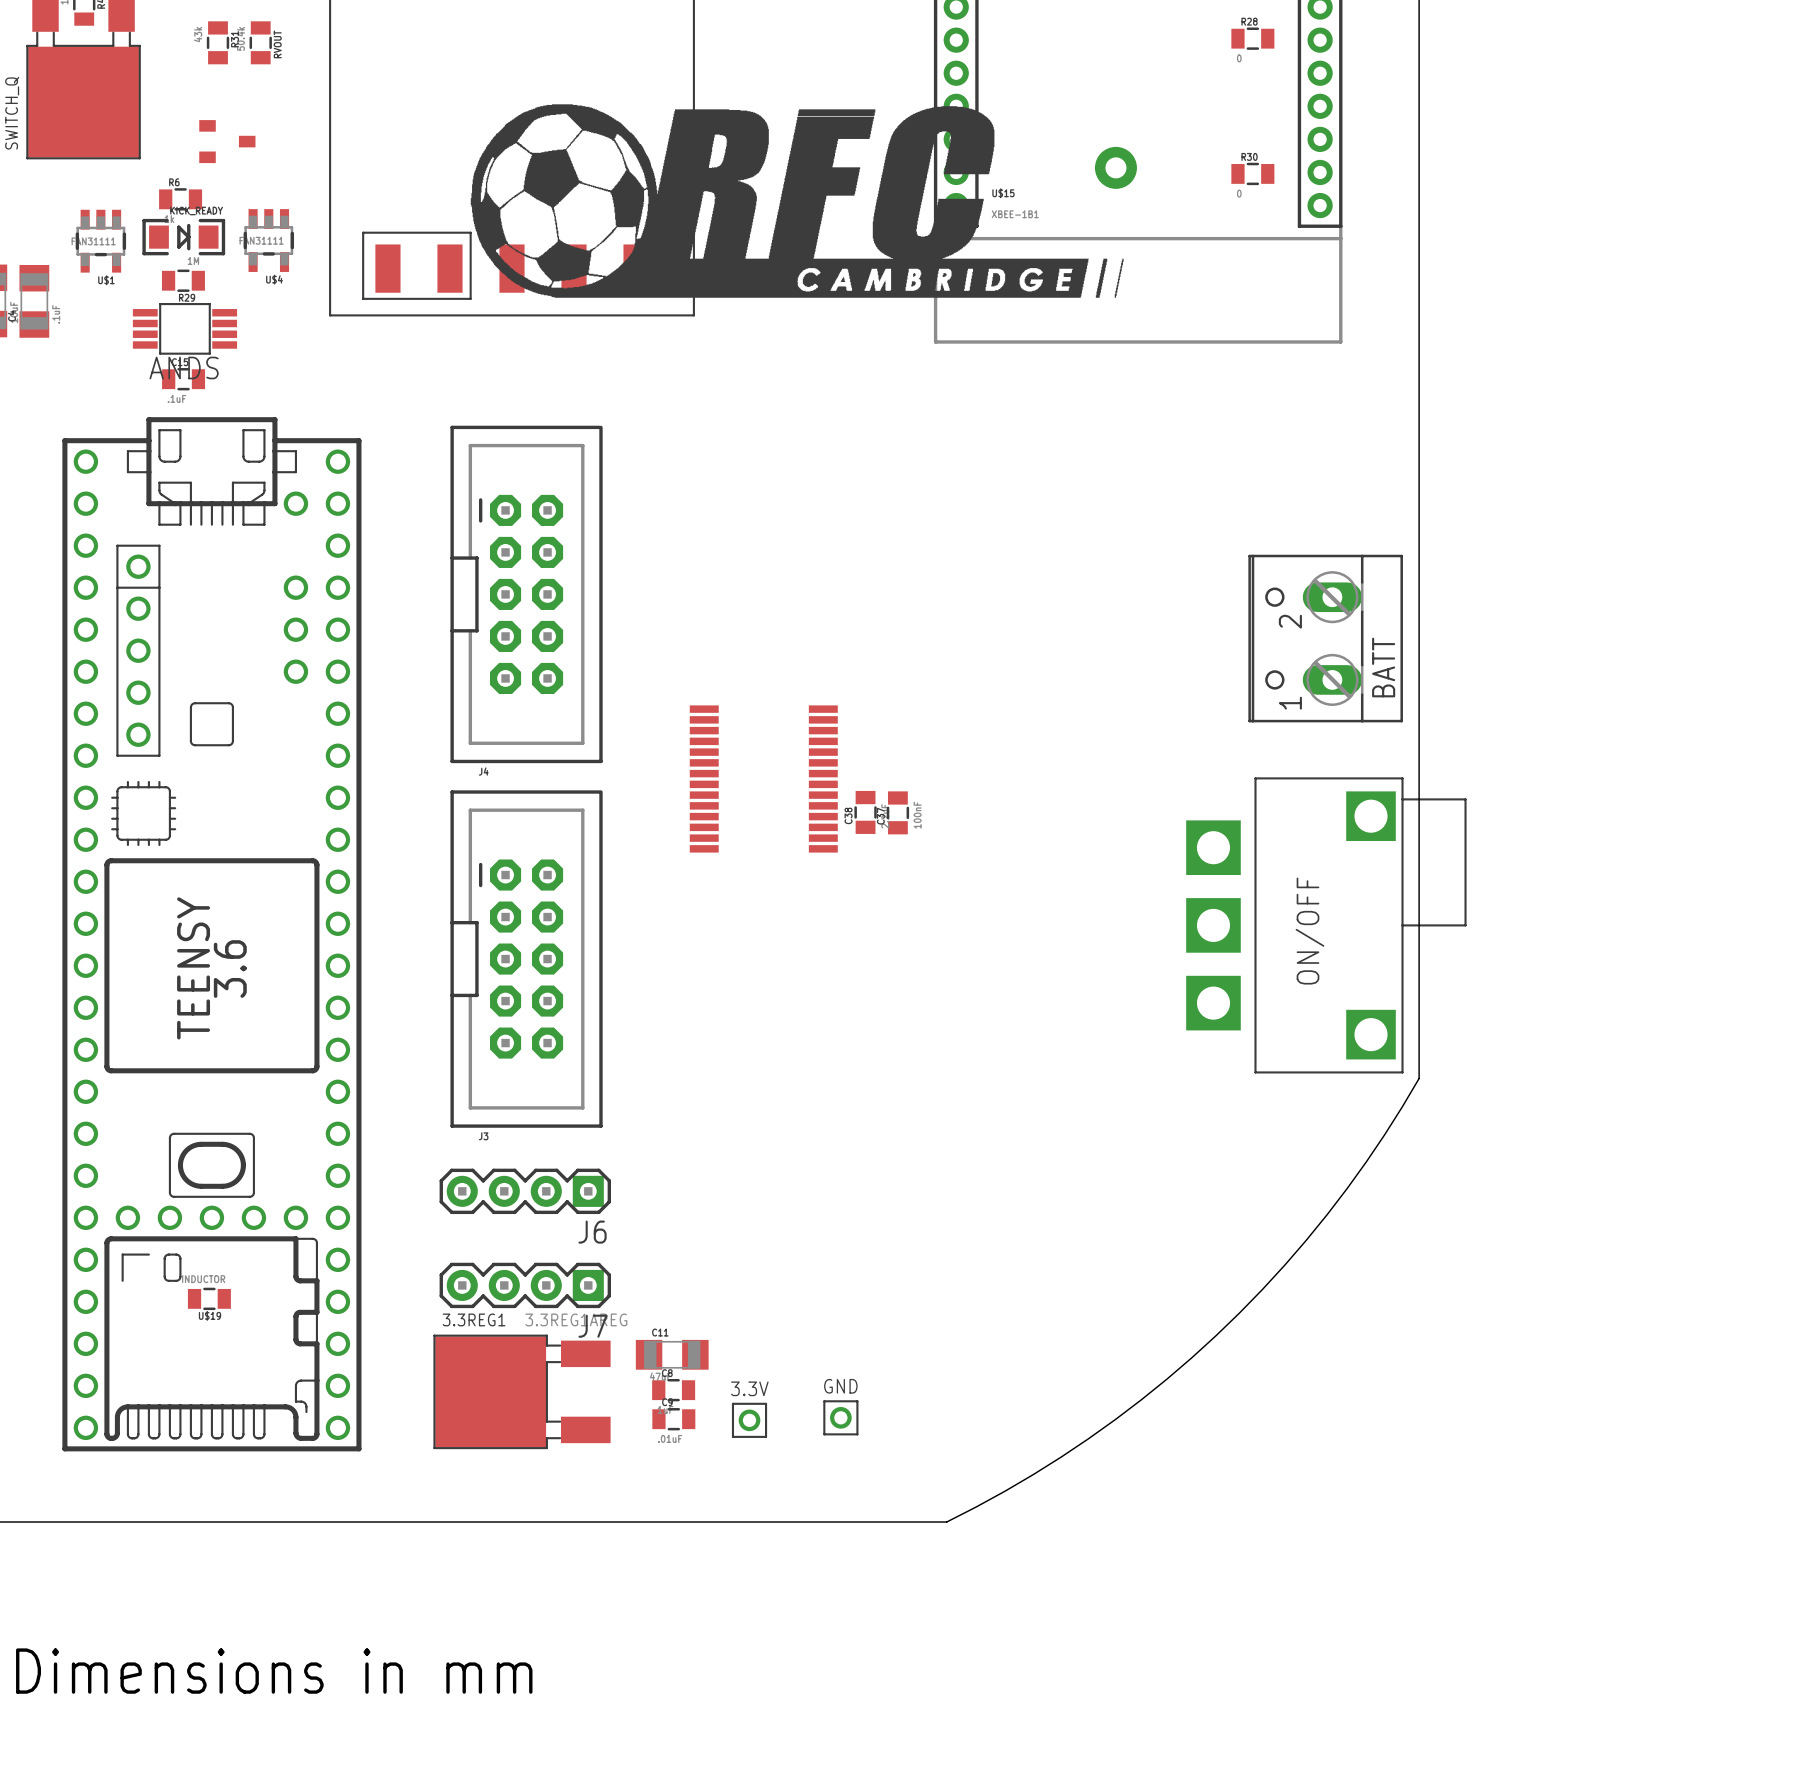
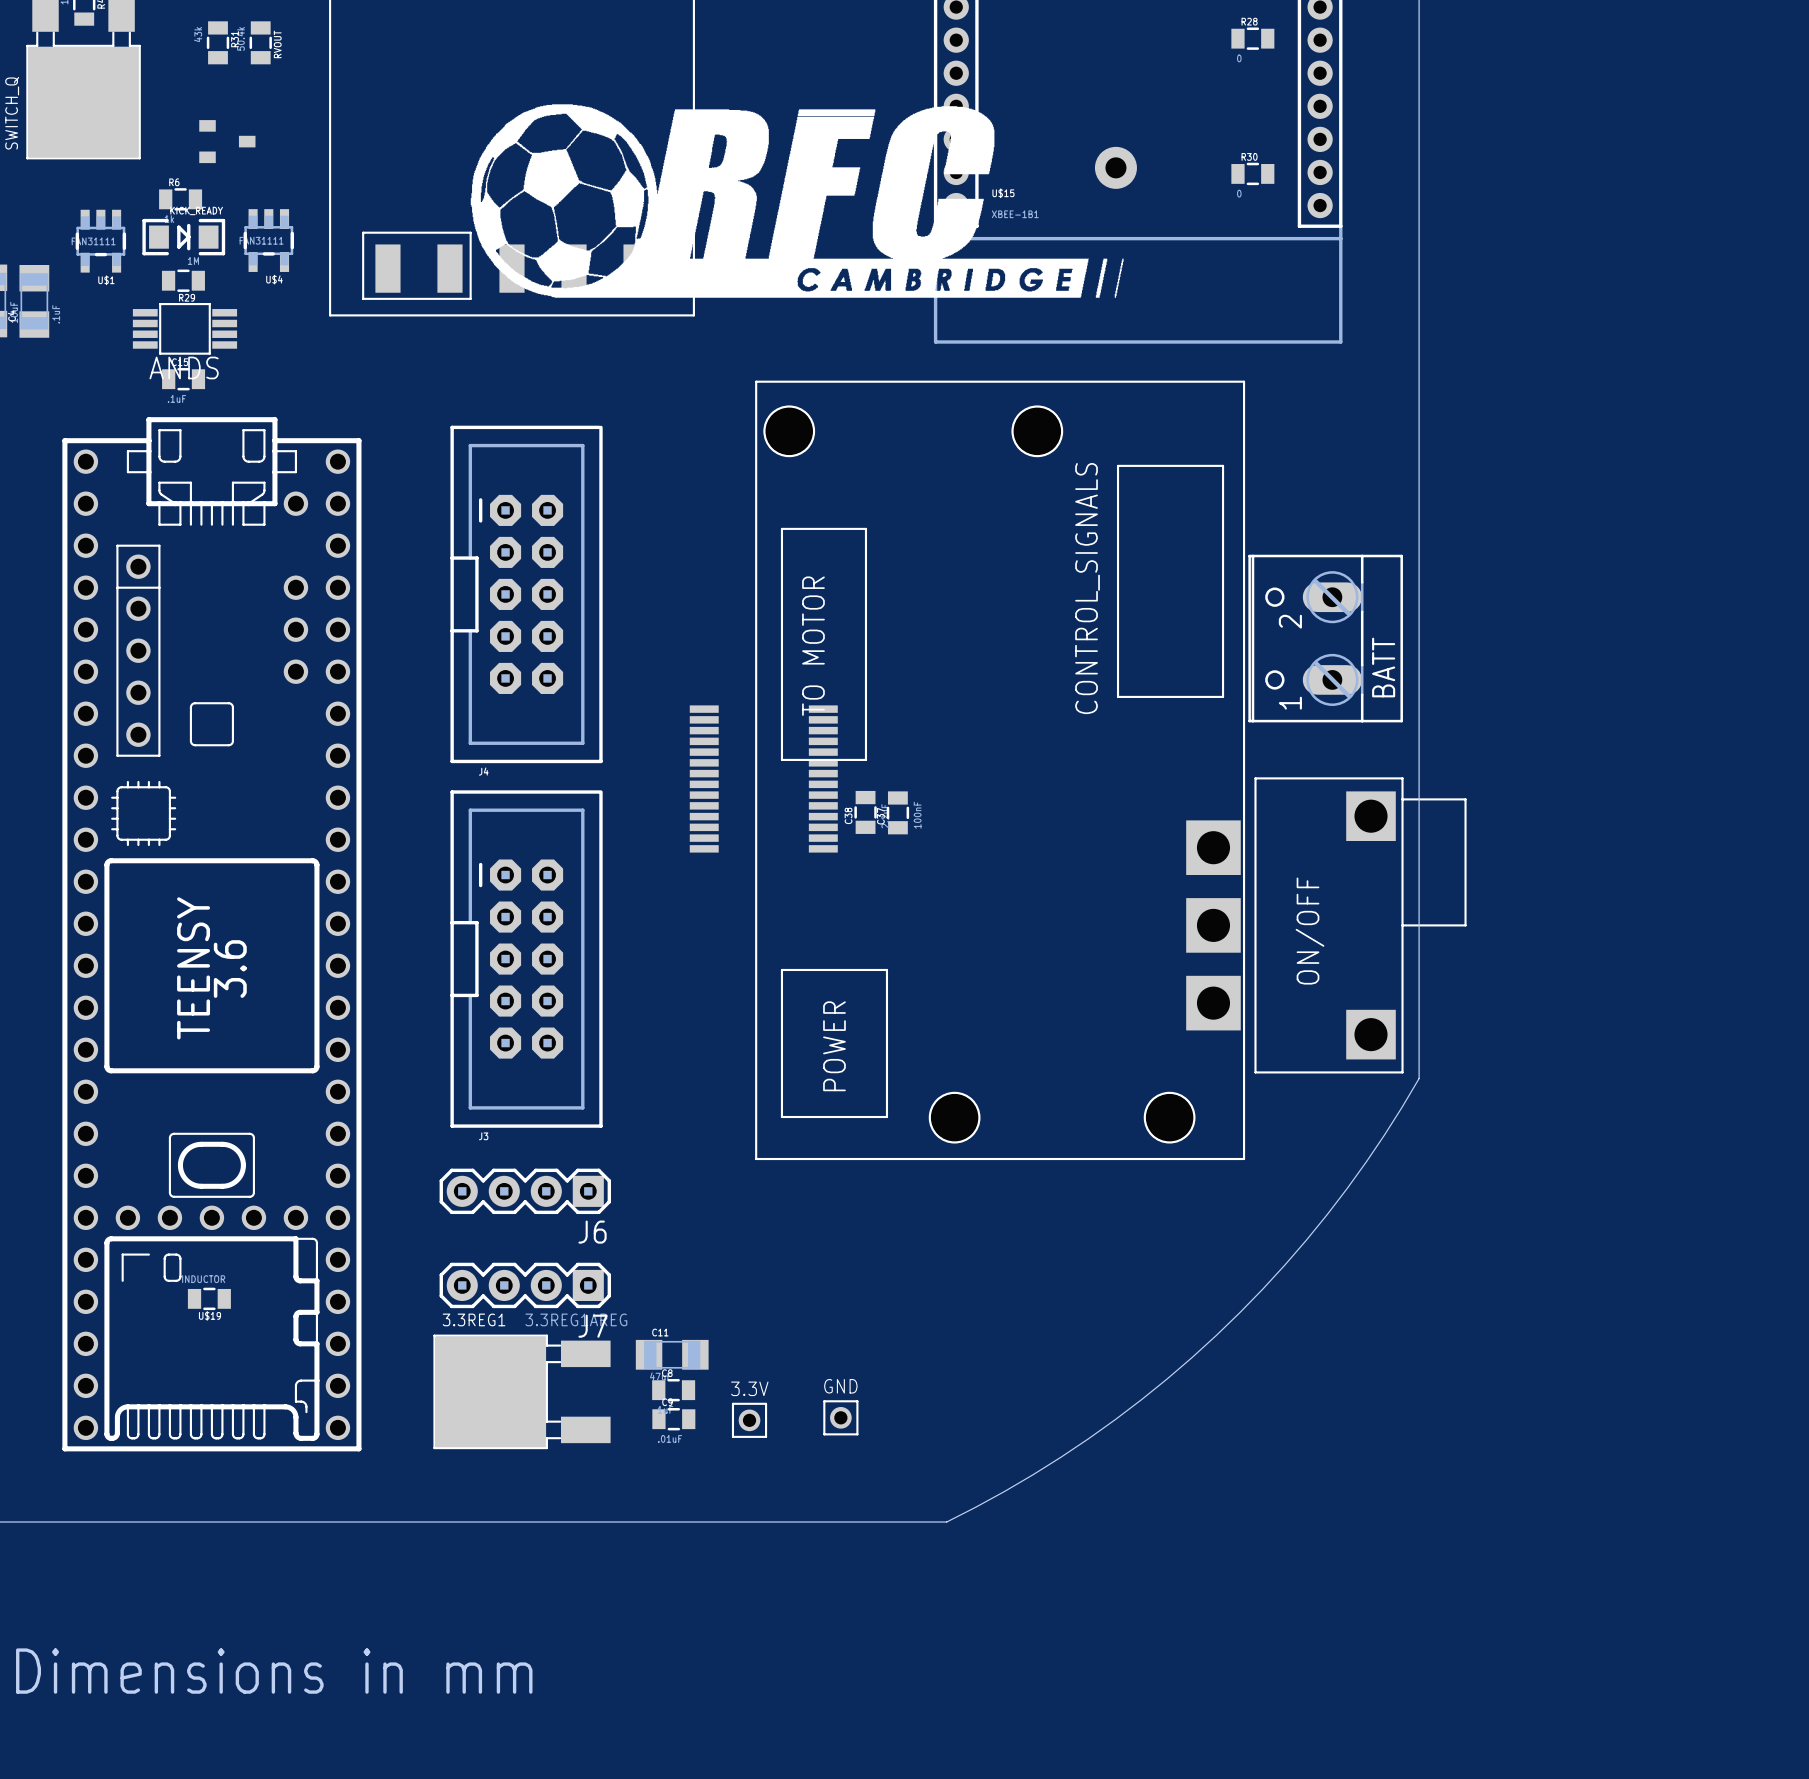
part: none -> (1000, 770)

